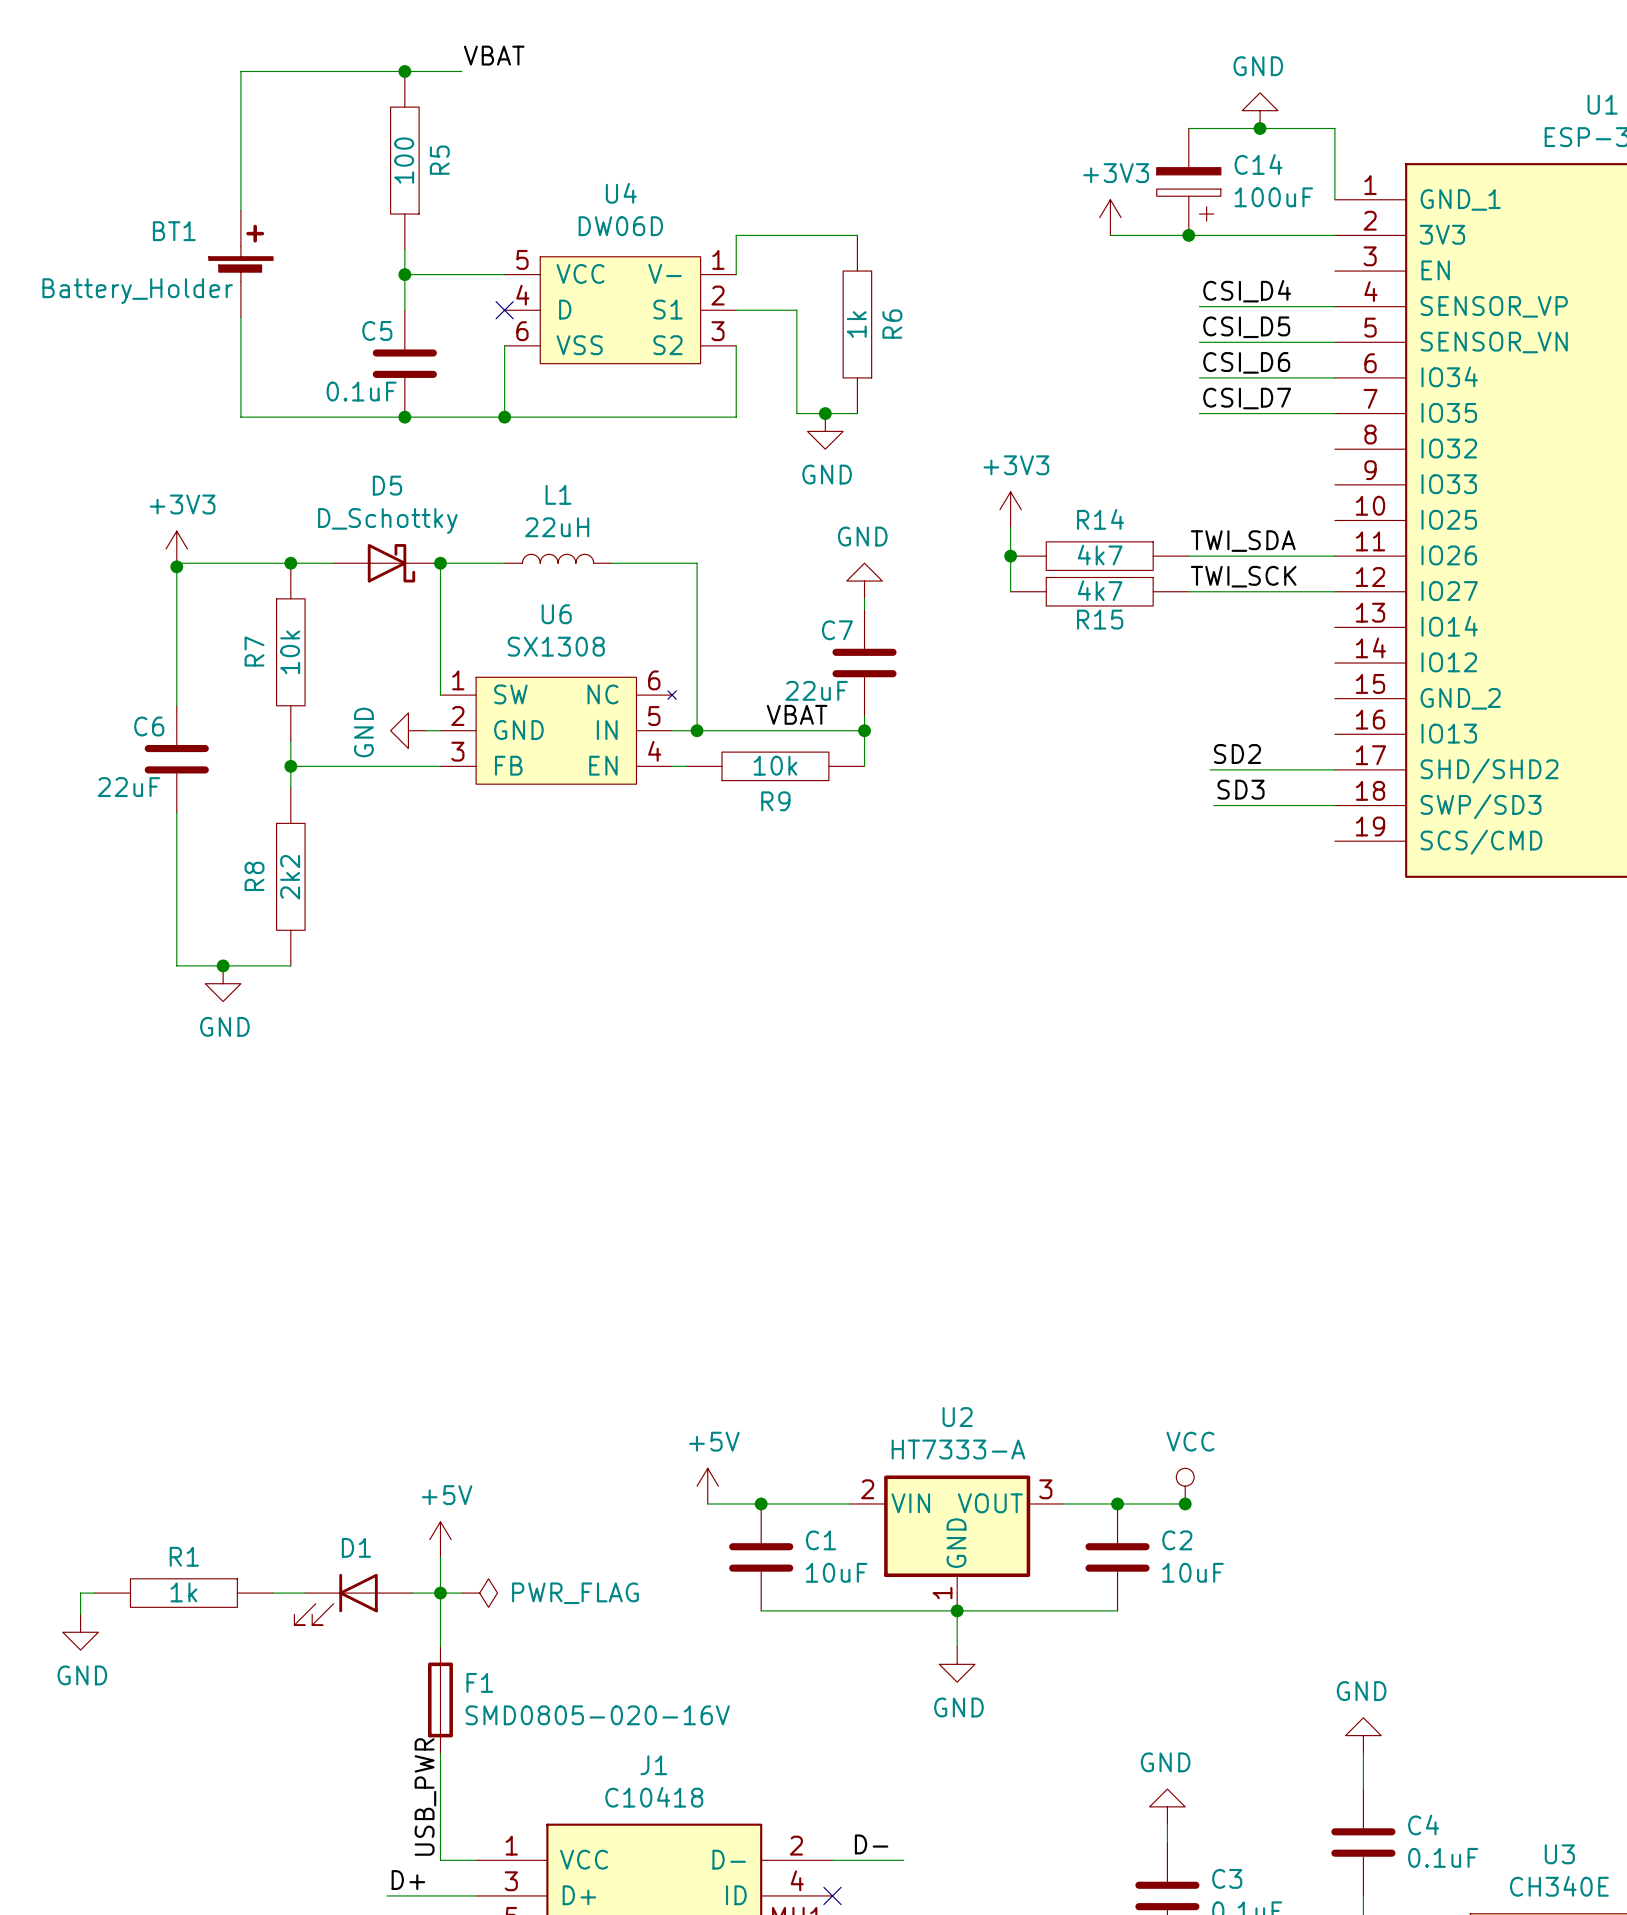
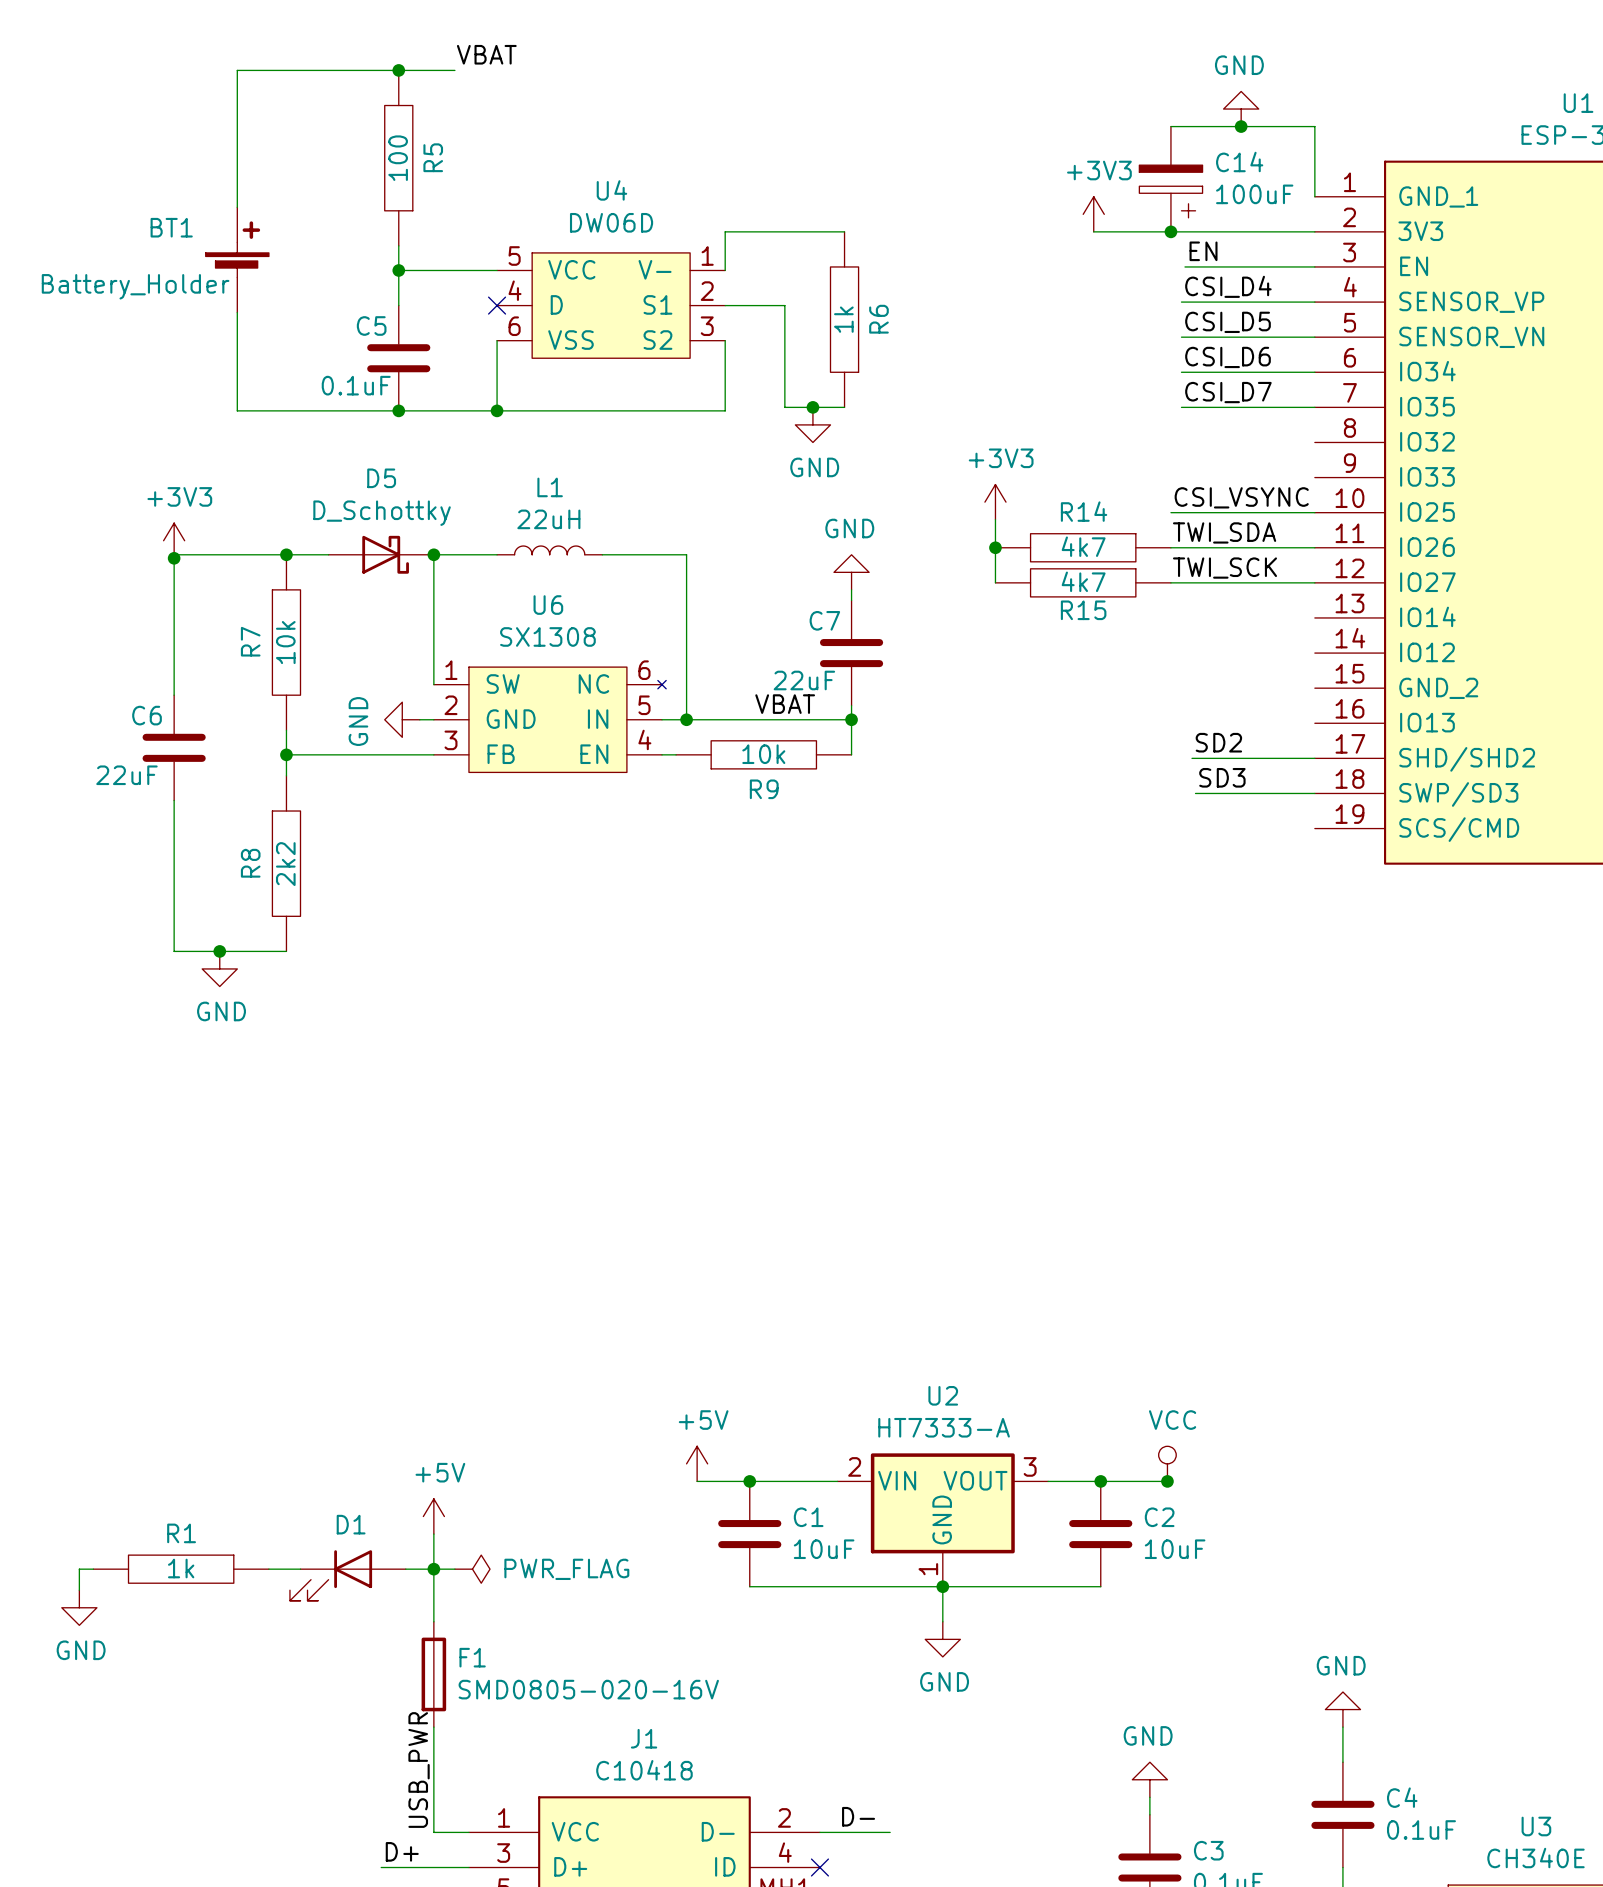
label: none -> EN (1203, 251)
wire: none -> (1185, 266) (1314, 266)
label: none -> CSI_VSYNC (1241, 497)
wire: none -> (1170, 512) (1314, 512)

